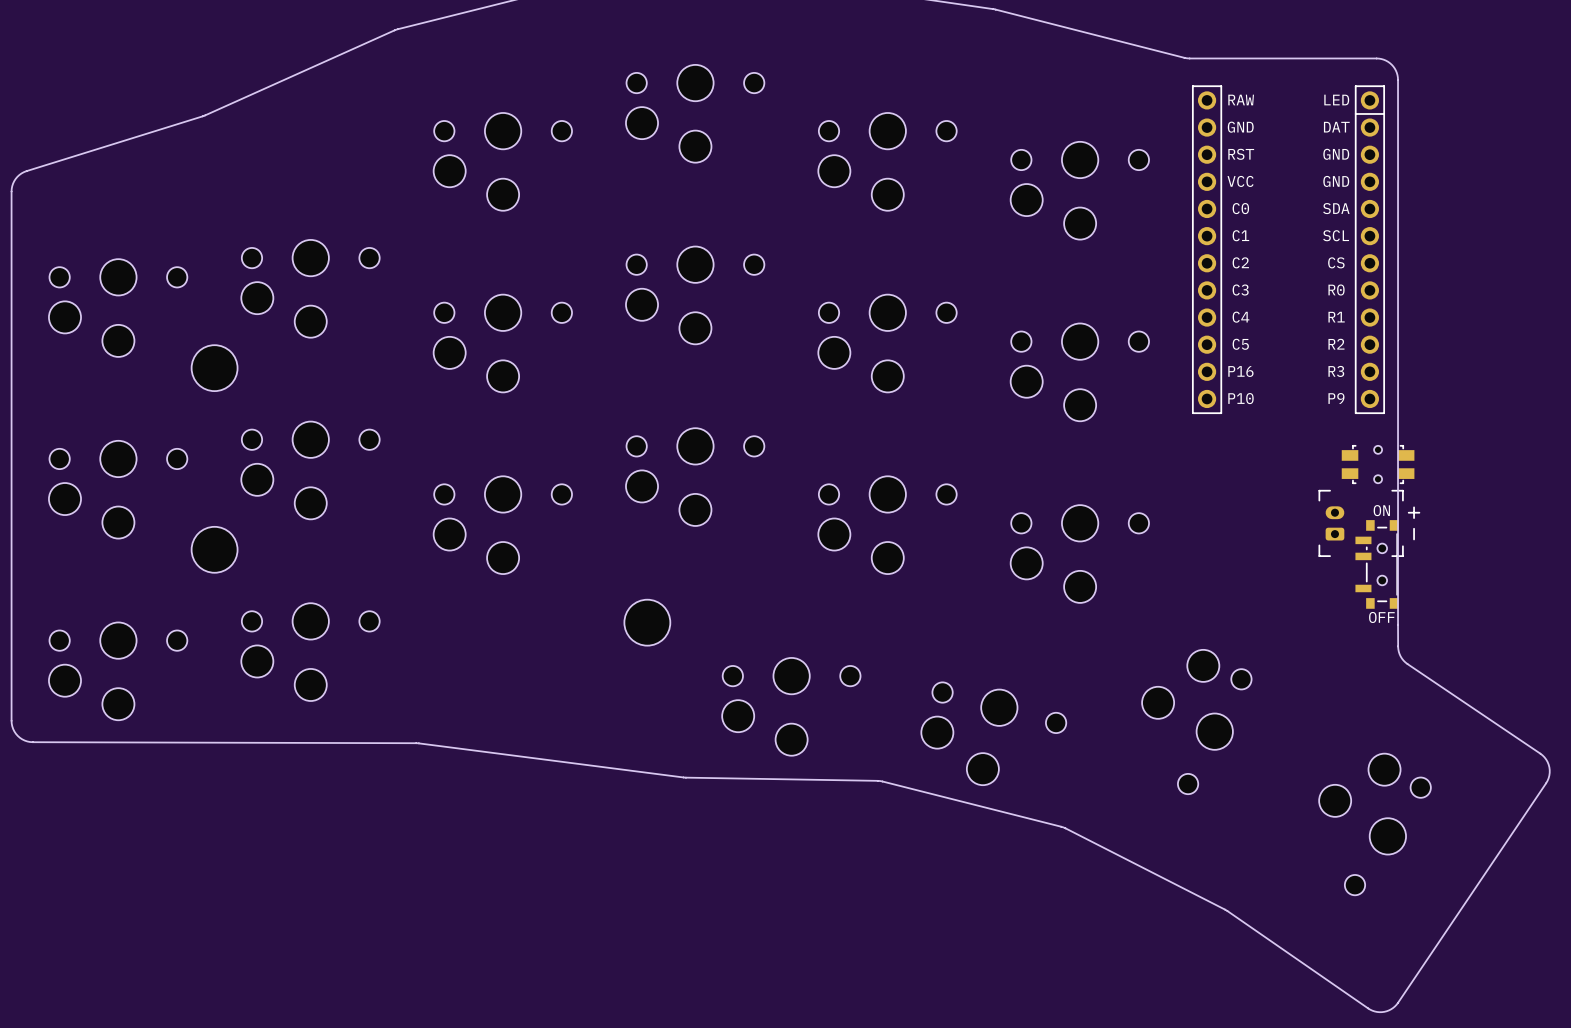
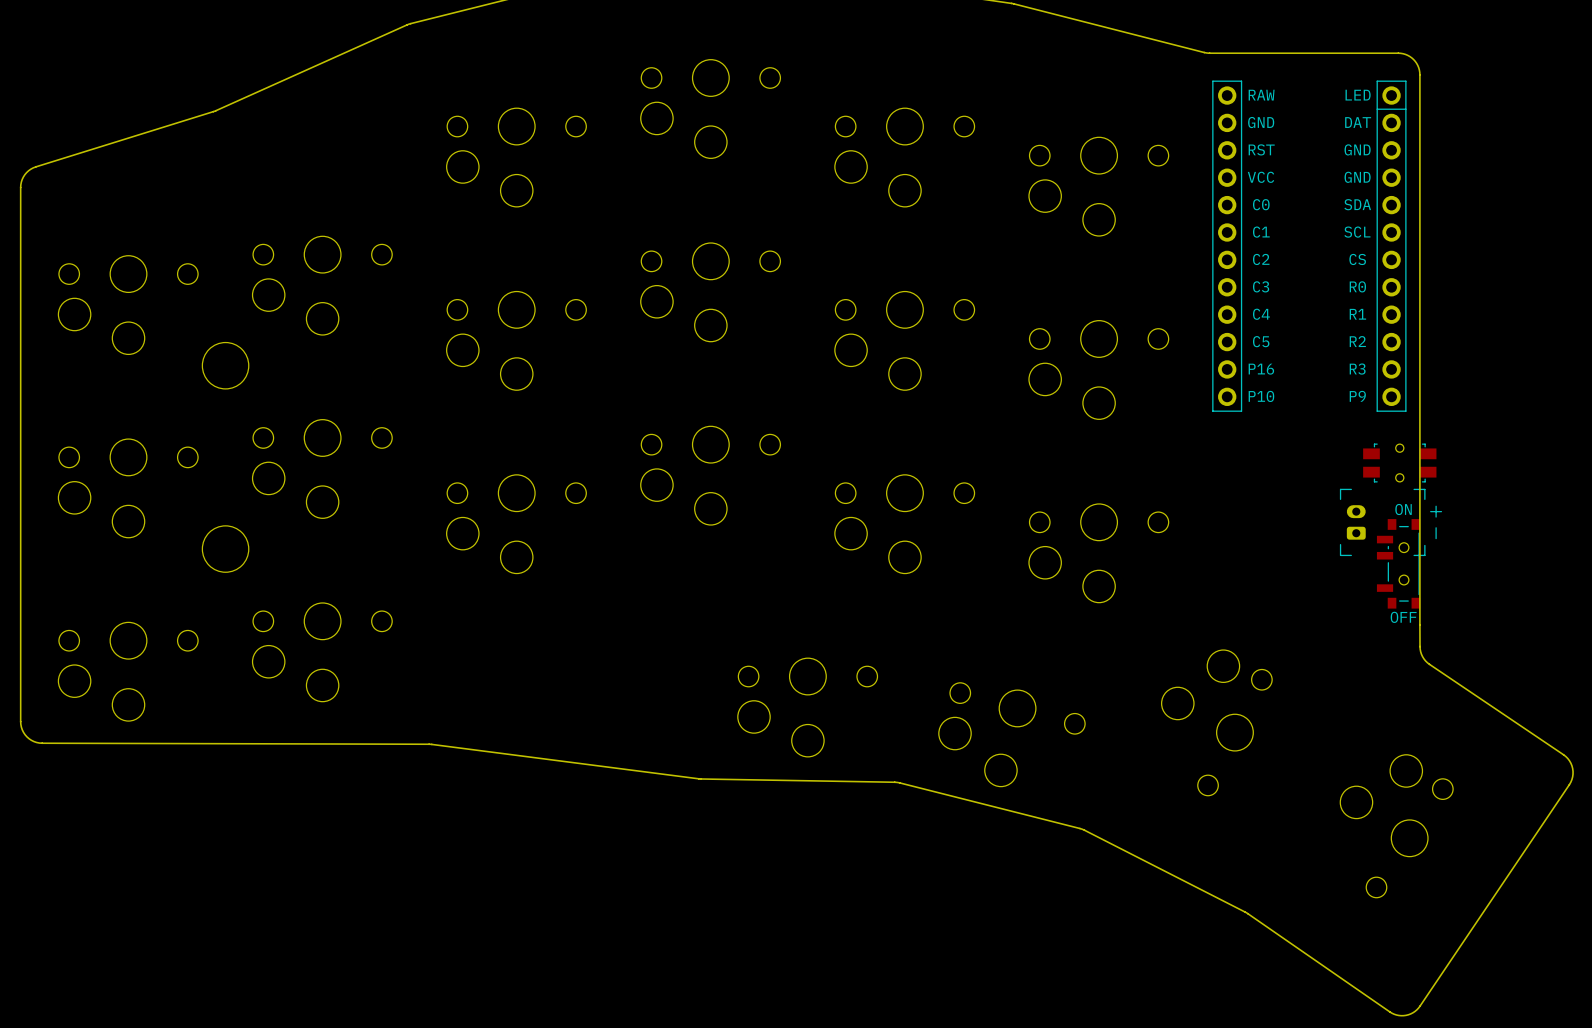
part: (647, 622) -> none

